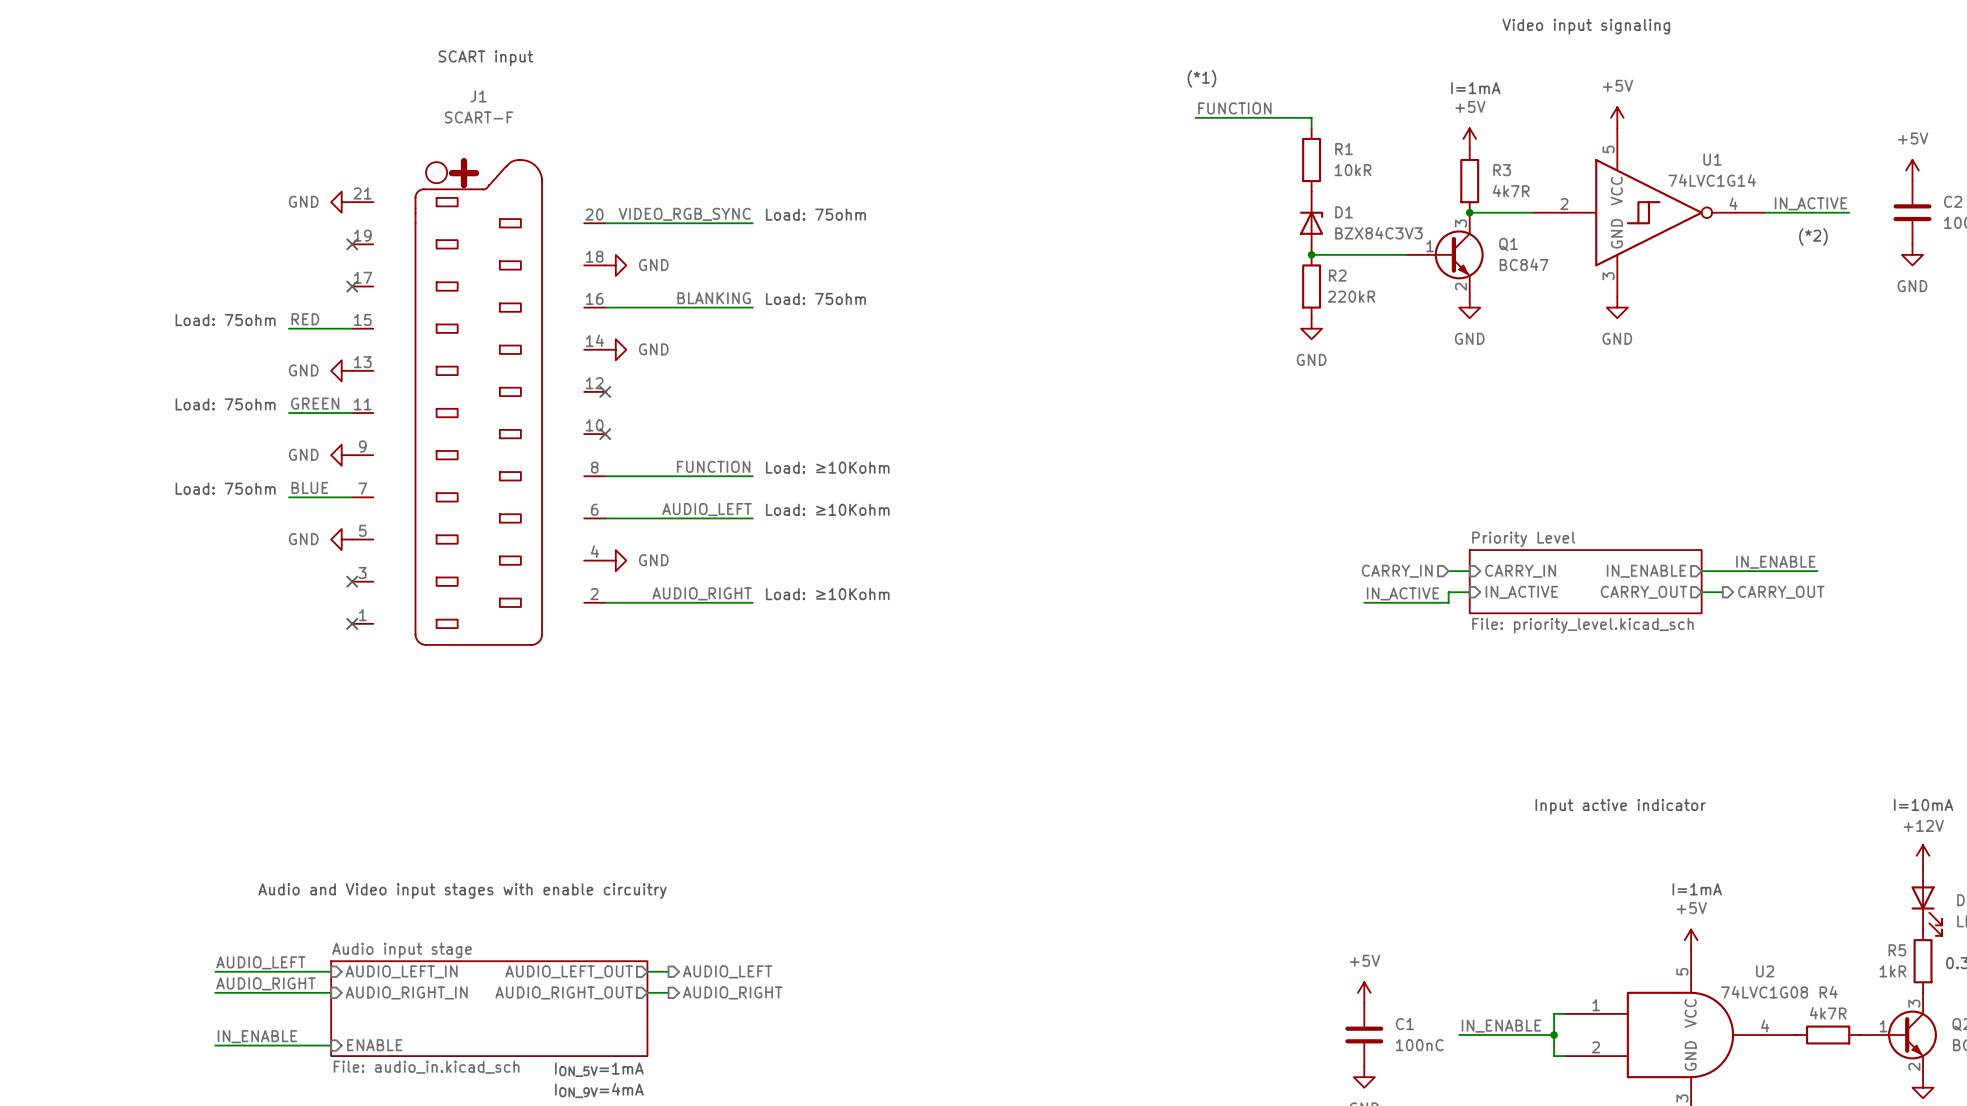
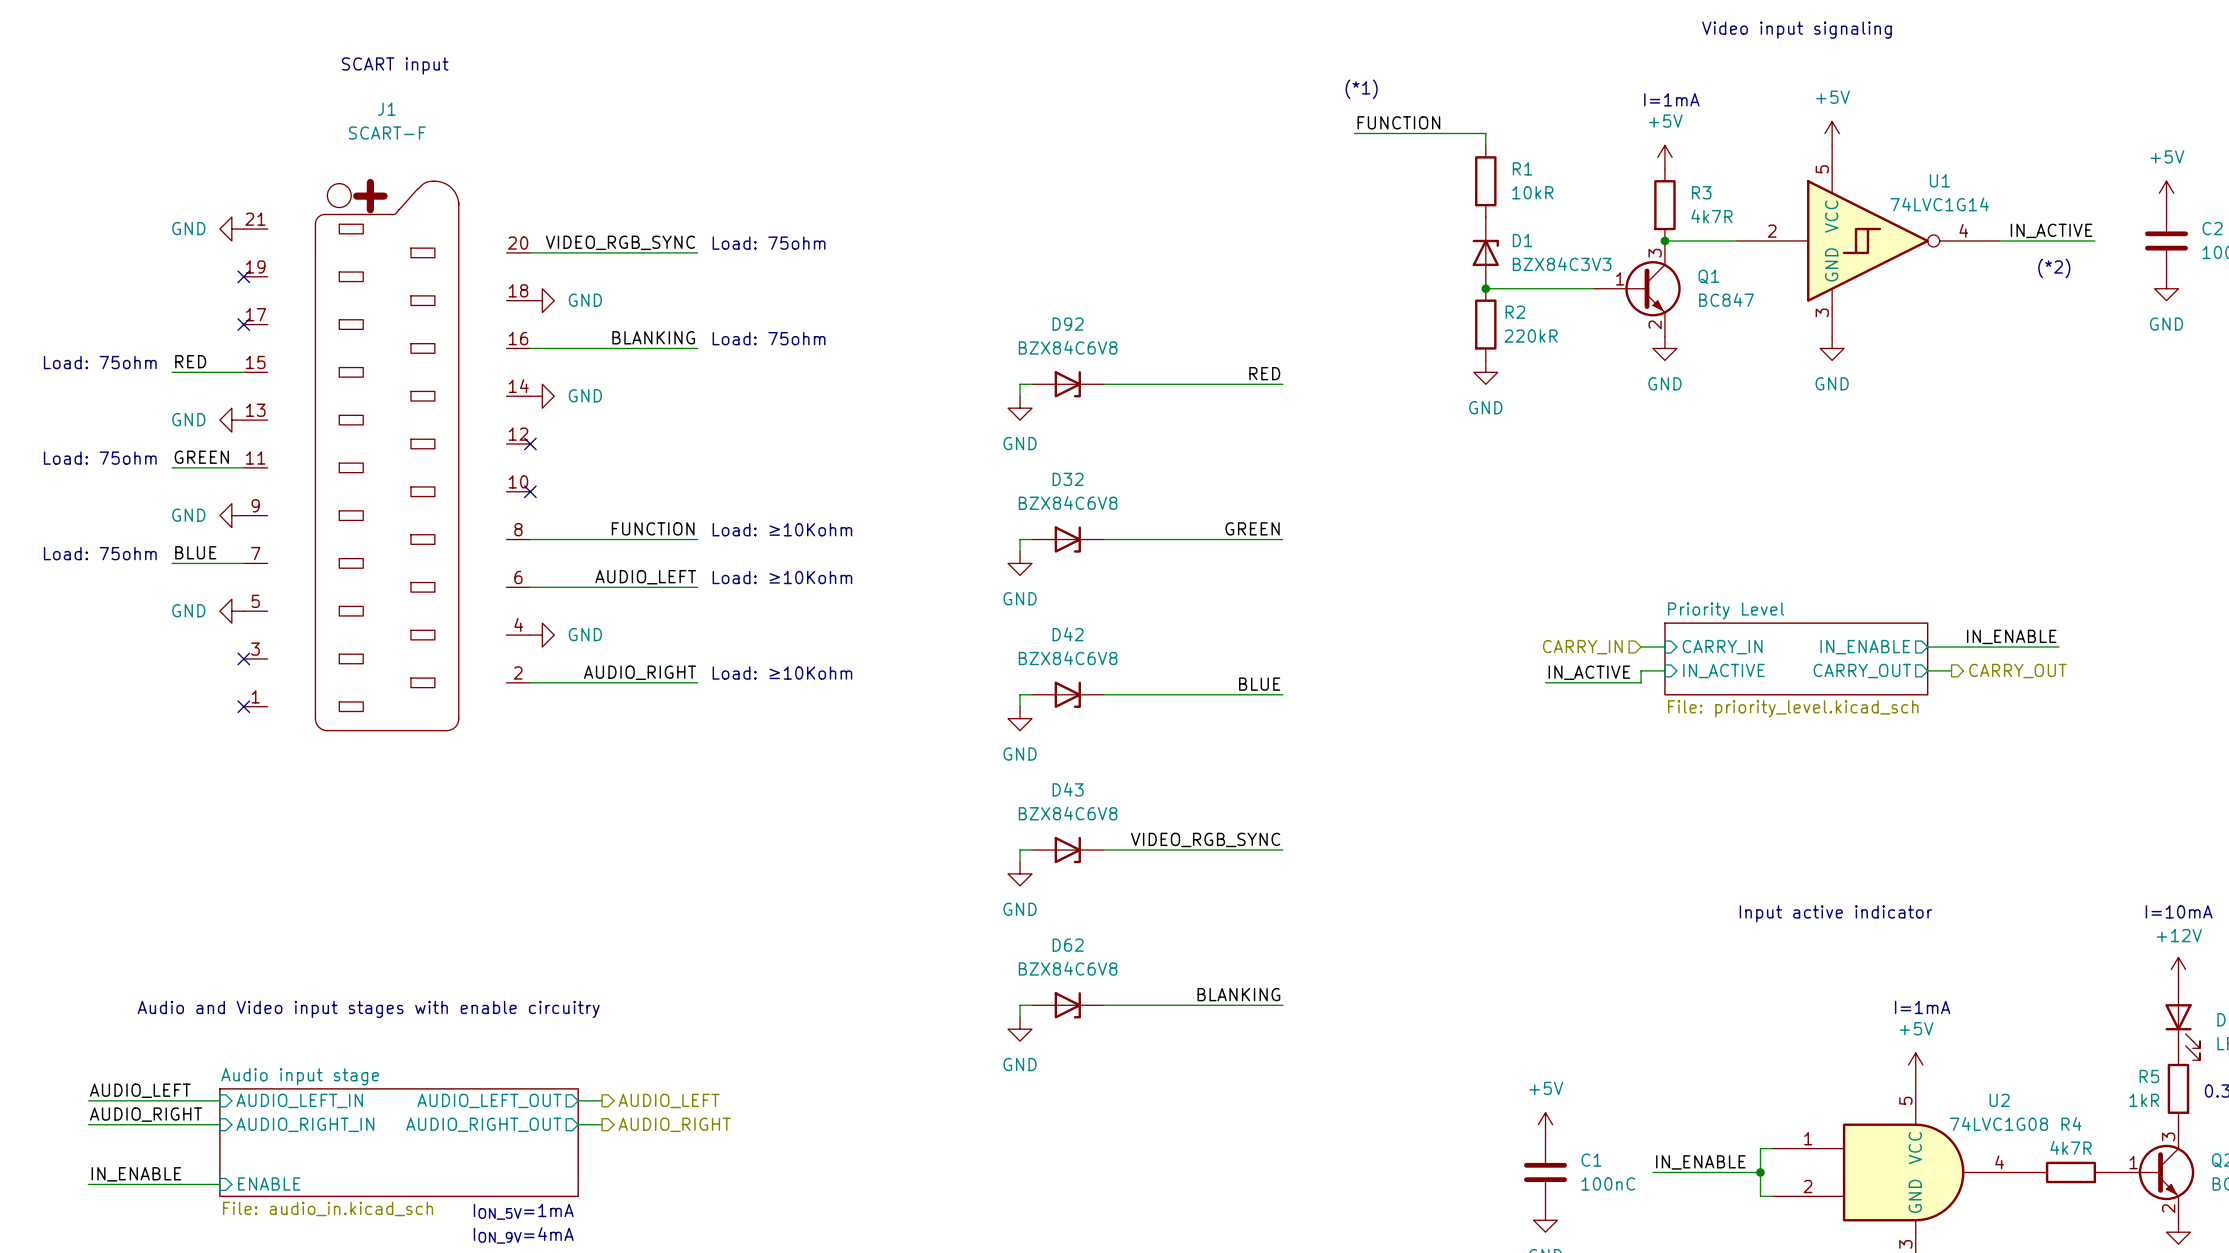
text position: SCART input (485, 58) -> SCART input (395, 65)
power symbol: none -> GND (231, 229)
power symbol: GND (341, 202) -> none
text: none -> Load: 75ohm (769, 243)
label position: VIDEO_RGB_SYNC (684, 214) -> VIDEO_RGB_SYNC (620, 242)
text: Load: 75ohm (815, 214) -> none
wire: (615, 223) (752, 223) -> (530, 252) (685, 252)
no-connect mark: none -> (243, 276)
no-connect mark: (352, 244) -> none
power symbol: none -> GND (542, 300)
power symbol: GND (615, 265) -> none
no-connect mark: none -> (243, 324)
no-connect mark: (352, 286) -> none
text: none -> Load: 75ohm (769, 338)
label position: BLANKING (714, 298) -> BLANKING (653, 337)
text: Load: 75ohm (815, 298) -> none
wire: (615, 307) (752, 307) -> (530, 348) (685, 348)
label position: RED (305, 319) -> RED (190, 361)
text: none -> Load: 75ohm (100, 362)
text: Load: 75ohm (225, 320) -> none
wire: (288, 328) (352, 328) -> (172, 372) (243, 372)
label: none -> RED (1264, 373)
wire: none -> (1031, 384) (1020, 384) (1020, 396)
D92: none -> BZX84C6V8 (1067, 384)
wire: none -> (1103, 384) (1282, 384)
power symbol: none -> GND (542, 396)
power symbol: GND (615, 349) -> none
power symbol: none -> GND (1020, 408)
power symbol: none -> GND (231, 420)
power symbol: GND (341, 370) -> none
no-connect mark: none -> (530, 443)
no-connect mark: (605, 391) -> none
J1 position: (478, 402) -> (387, 455)
label position: GREEN (315, 403) -> GREEN (201, 457)
text: none -> Load: 75ohm (100, 458)
text: Load: 75ohm (225, 404) -> none
wire: (288, 413) (352, 413) -> (172, 467) (243, 467)
no-connect mark: none -> (530, 491)
no-connect mark: (605, 434) -> none
power symbol: none -> GND (231, 515)
power symbol: GND (341, 455) -> none
label position: FUNCTION (713, 466) -> FUNCTION (653, 528)
label: none -> GREEN (1252, 528)
text position: Load: ≥10Kohm (827, 467) -> Load: ≥10Kohm (782, 529)
wire: (615, 476) (752, 476) -> (530, 539) (685, 539)
wire: none -> (1031, 539) (1020, 539) (1020, 551)
D32: none -> BZX84C6V8 (1067, 539)
wire: none -> (1103, 539) (1282, 539)
label position: BLUE (309, 487) -> BLUE (195, 552)
text: none -> Load: 75ohm (100, 553)
text: Load: 75ohm (225, 488) -> none
wire: (288, 497) (352, 497) -> (172, 563) (243, 563)
power symbol: none -> GND (1020, 563)
label position: AUDIO_LEFT (707, 509) -> AUDIO_LEFT (645, 577)
text position: Load: ≥10Kohm (827, 509) -> Load: ≥10Kohm (782, 577)
wire: (615, 518) (752, 518) -> (530, 587) (685, 587)
power symbol: none -> GND (231, 611)
power symbol: GND (341, 539) -> none
power symbol: none -> GND (542, 635)
power symbol: GND (615, 560) -> none
no-connect mark: none -> (243, 658)
no-connect mark: (352, 581) -> none
label position: AUDIO_RIGHT (702, 593) -> AUDIO_RIGHT (640, 672)
text position: Load: ≥10Kohm (827, 594) -> Load: ≥10Kohm (782, 673)
wire: (615, 602) (752, 602) -> (530, 682) (685, 682)
label: none -> BLUE (1259, 684)
wire: none -> (1031, 694) (1020, 694) (1020, 706)
D42: none -> BZX84C6V8 (1067, 694)
wire: none -> (1103, 694) (1282, 694)
no-connect mark: none -> (243, 706)
no-connect mark: (352, 623) -> none
power symbol: none -> GND (1020, 718)
label: none -> VIDEO_RGB_SYNC (1205, 839)
wire: none -> (1031, 850) (1020, 850) (1020, 861)
D43: none -> BZX84C6V8 (1067, 850)
wire: none -> (1103, 850) (1282, 850)
power symbol: none -> GND (1020, 873)
label: none -> BLANKING (1238, 994)
wire: none -> (1031, 1005) (1020, 1005) (1020, 1017)
D62: none -> BZX84C6V8 (1067, 1005)
wire: none -> (1103, 1005) (1282, 1005)
text position: Audio and Video input stages with enable circuitry (462, 891) -> Audio and Video input stages with enable circuitry (368, 1009)
power symbol: none -> GND (1020, 1029)
label position: AUDIO_LEFT (260, 962) -> AUDIO_LEFT (140, 1090)
wire: (215, 971) (331, 971) -> (88, 1100) (219, 1100)
sheet pin position: AUDIO_LEFT_IN (401, 971) -> AUDIO_LEFT_IN (299, 1100)
sheet pin position: AUDIO_LEFT_OUT (569, 971) -> AUDIO_LEFT_OUT (489, 1100)
wire: (647, 971) (668, 971) -> (578, 1100) (602, 1100)
hierarchical label position: AUDIO_LEFT (727, 971) -> AUDIO_LEFT (669, 1100)
label position: AUDIO_RIGHT (265, 983) -> AUDIO_RIGHT (146, 1114)
wire: (215, 992) (331, 992) -> (88, 1124) (219, 1124)
sheet pin position: AUDIO_RIGHT_IN (406, 992) -> AUDIO_RIGHT_IN (305, 1124)
sheet pin position: AUDIO_RIGHT_OUT (564, 992) -> AUDIO_RIGHT_OUT (483, 1124)
wire: (647, 992) (668, 992) -> (578, 1124) (602, 1124)
hierarchical label position: AUDIO_RIGHT (732, 992) -> AUDIO_RIGHT (674, 1124)
sheet Audio input stage position: (489, 1008) -> (399, 1142)
label position: IN_ENABLE (257, 1036) -> IN_ENABLE (136, 1174)
wire: (215, 1045) (331, 1045) -> (88, 1184) (219, 1184)
sheet pin position: ENABLE (374, 1045) -> ENABLE (269, 1183)
text position: ION_5V=1mA (599, 1069) -> ION_5V=1mA (523, 1211)
text position: ION_9V=4mA (599, 1090) -> ION_9V=4mA (523, 1235)

